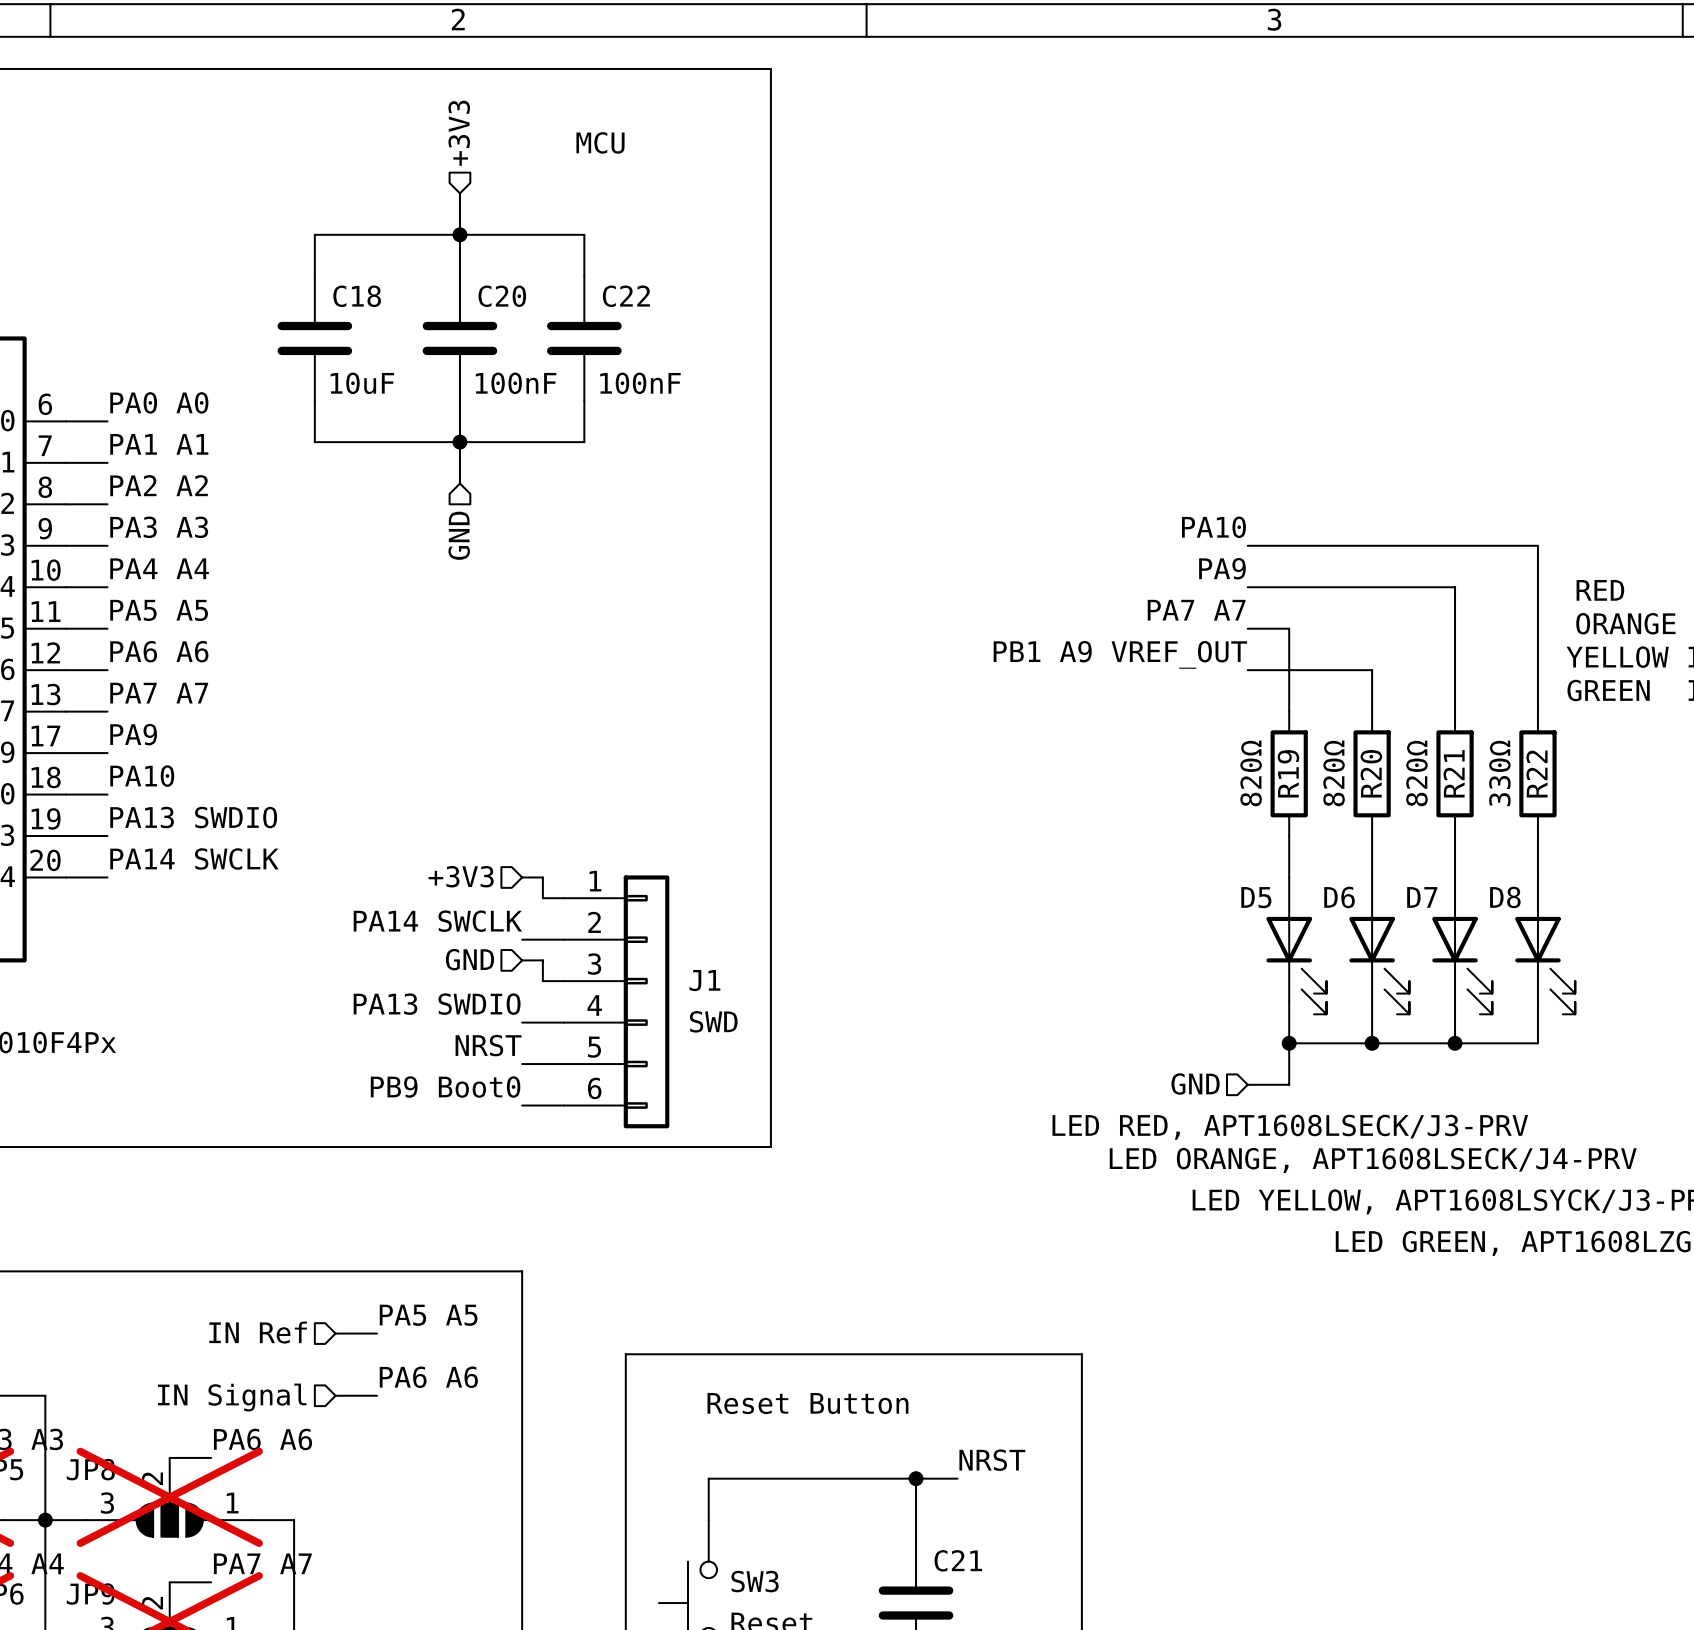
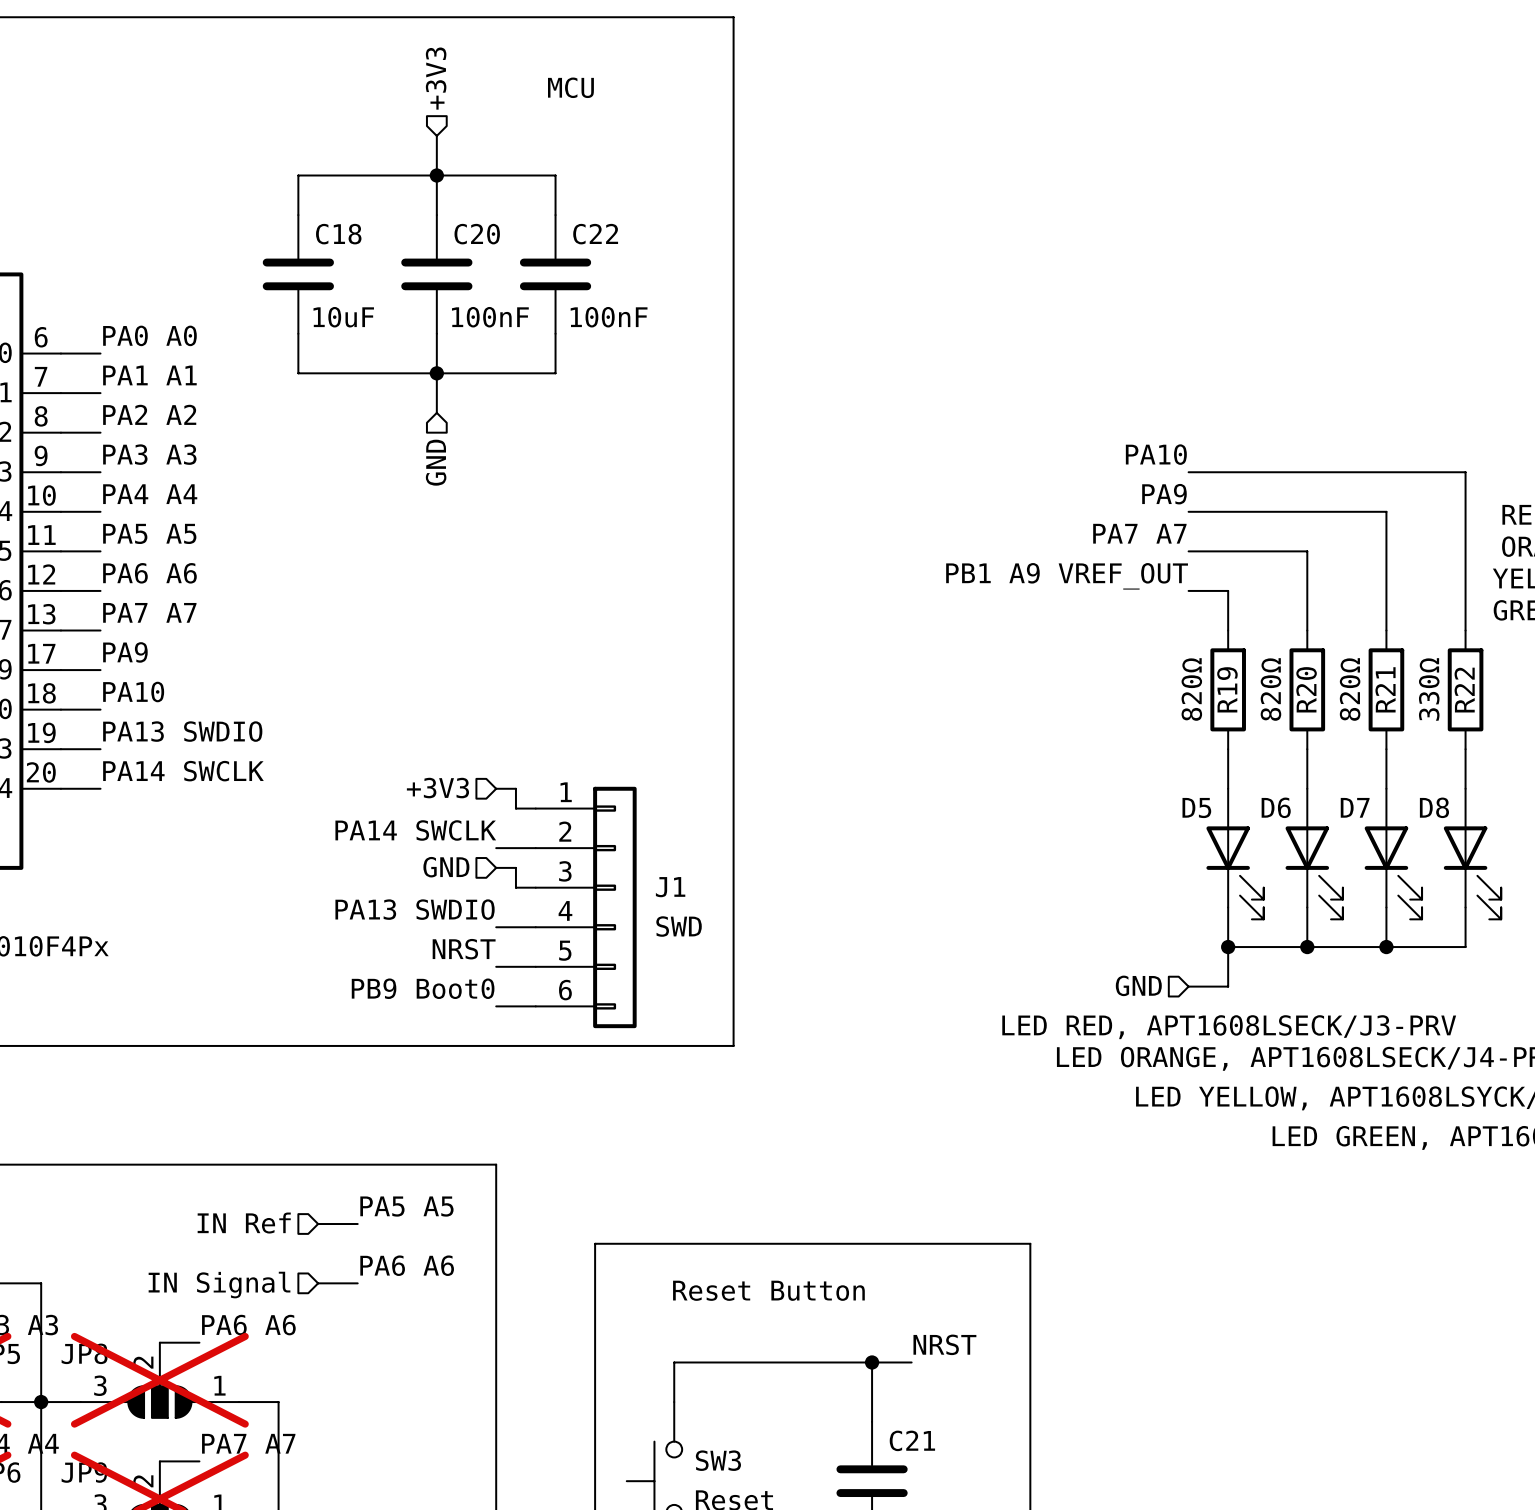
wire: (1289, 628) (1289, 670) (1372, 670) -> (1228, 551) (1307, 551) (1307, 590)

